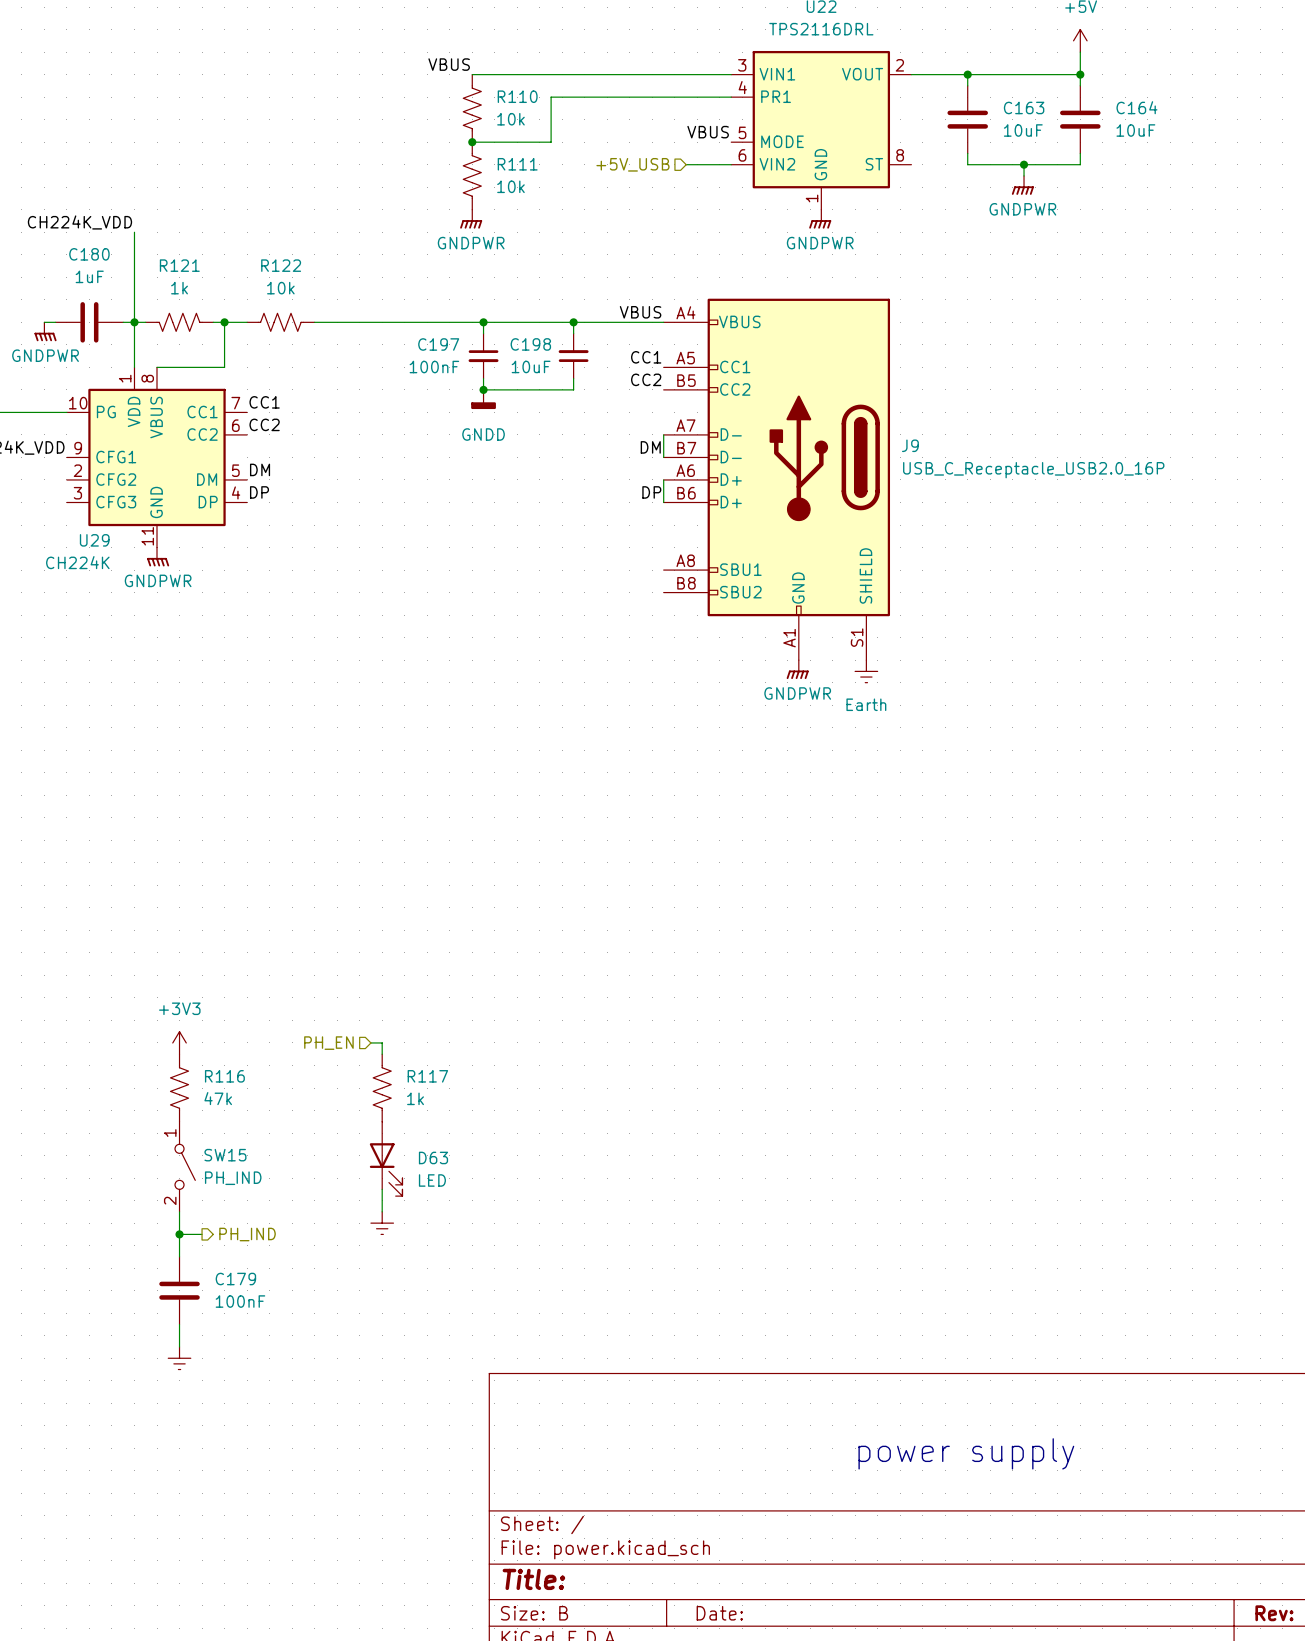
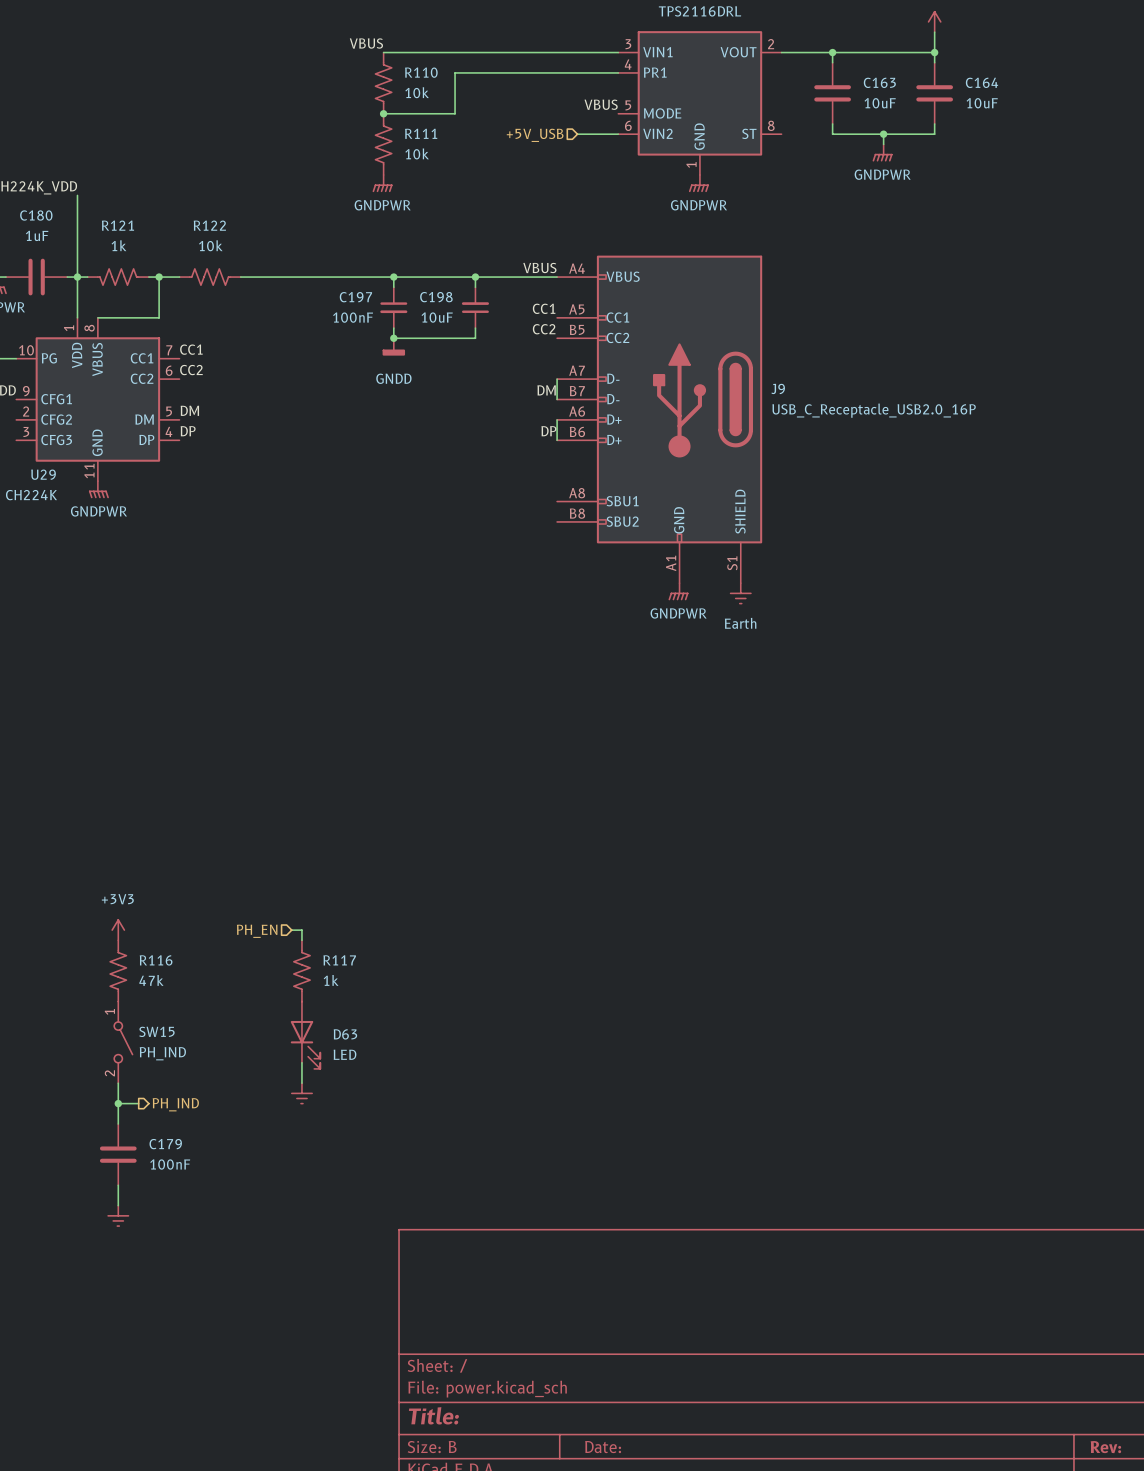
text: power supply (966, 1453) -> none

